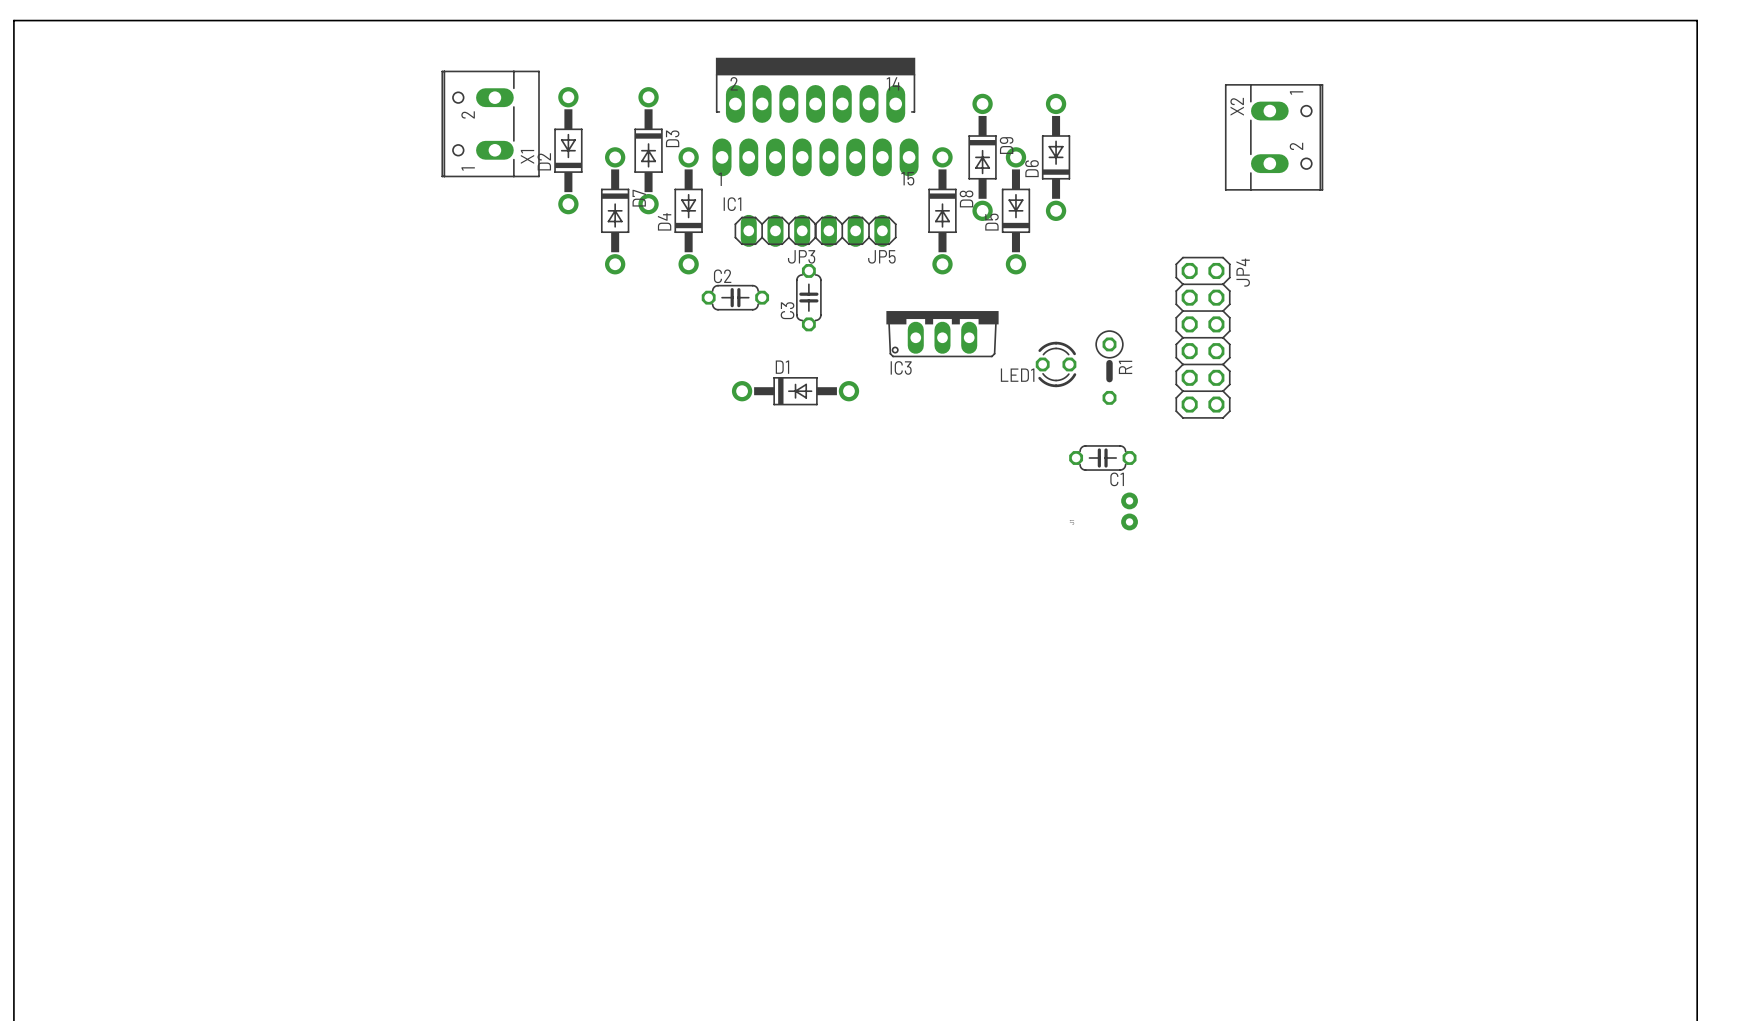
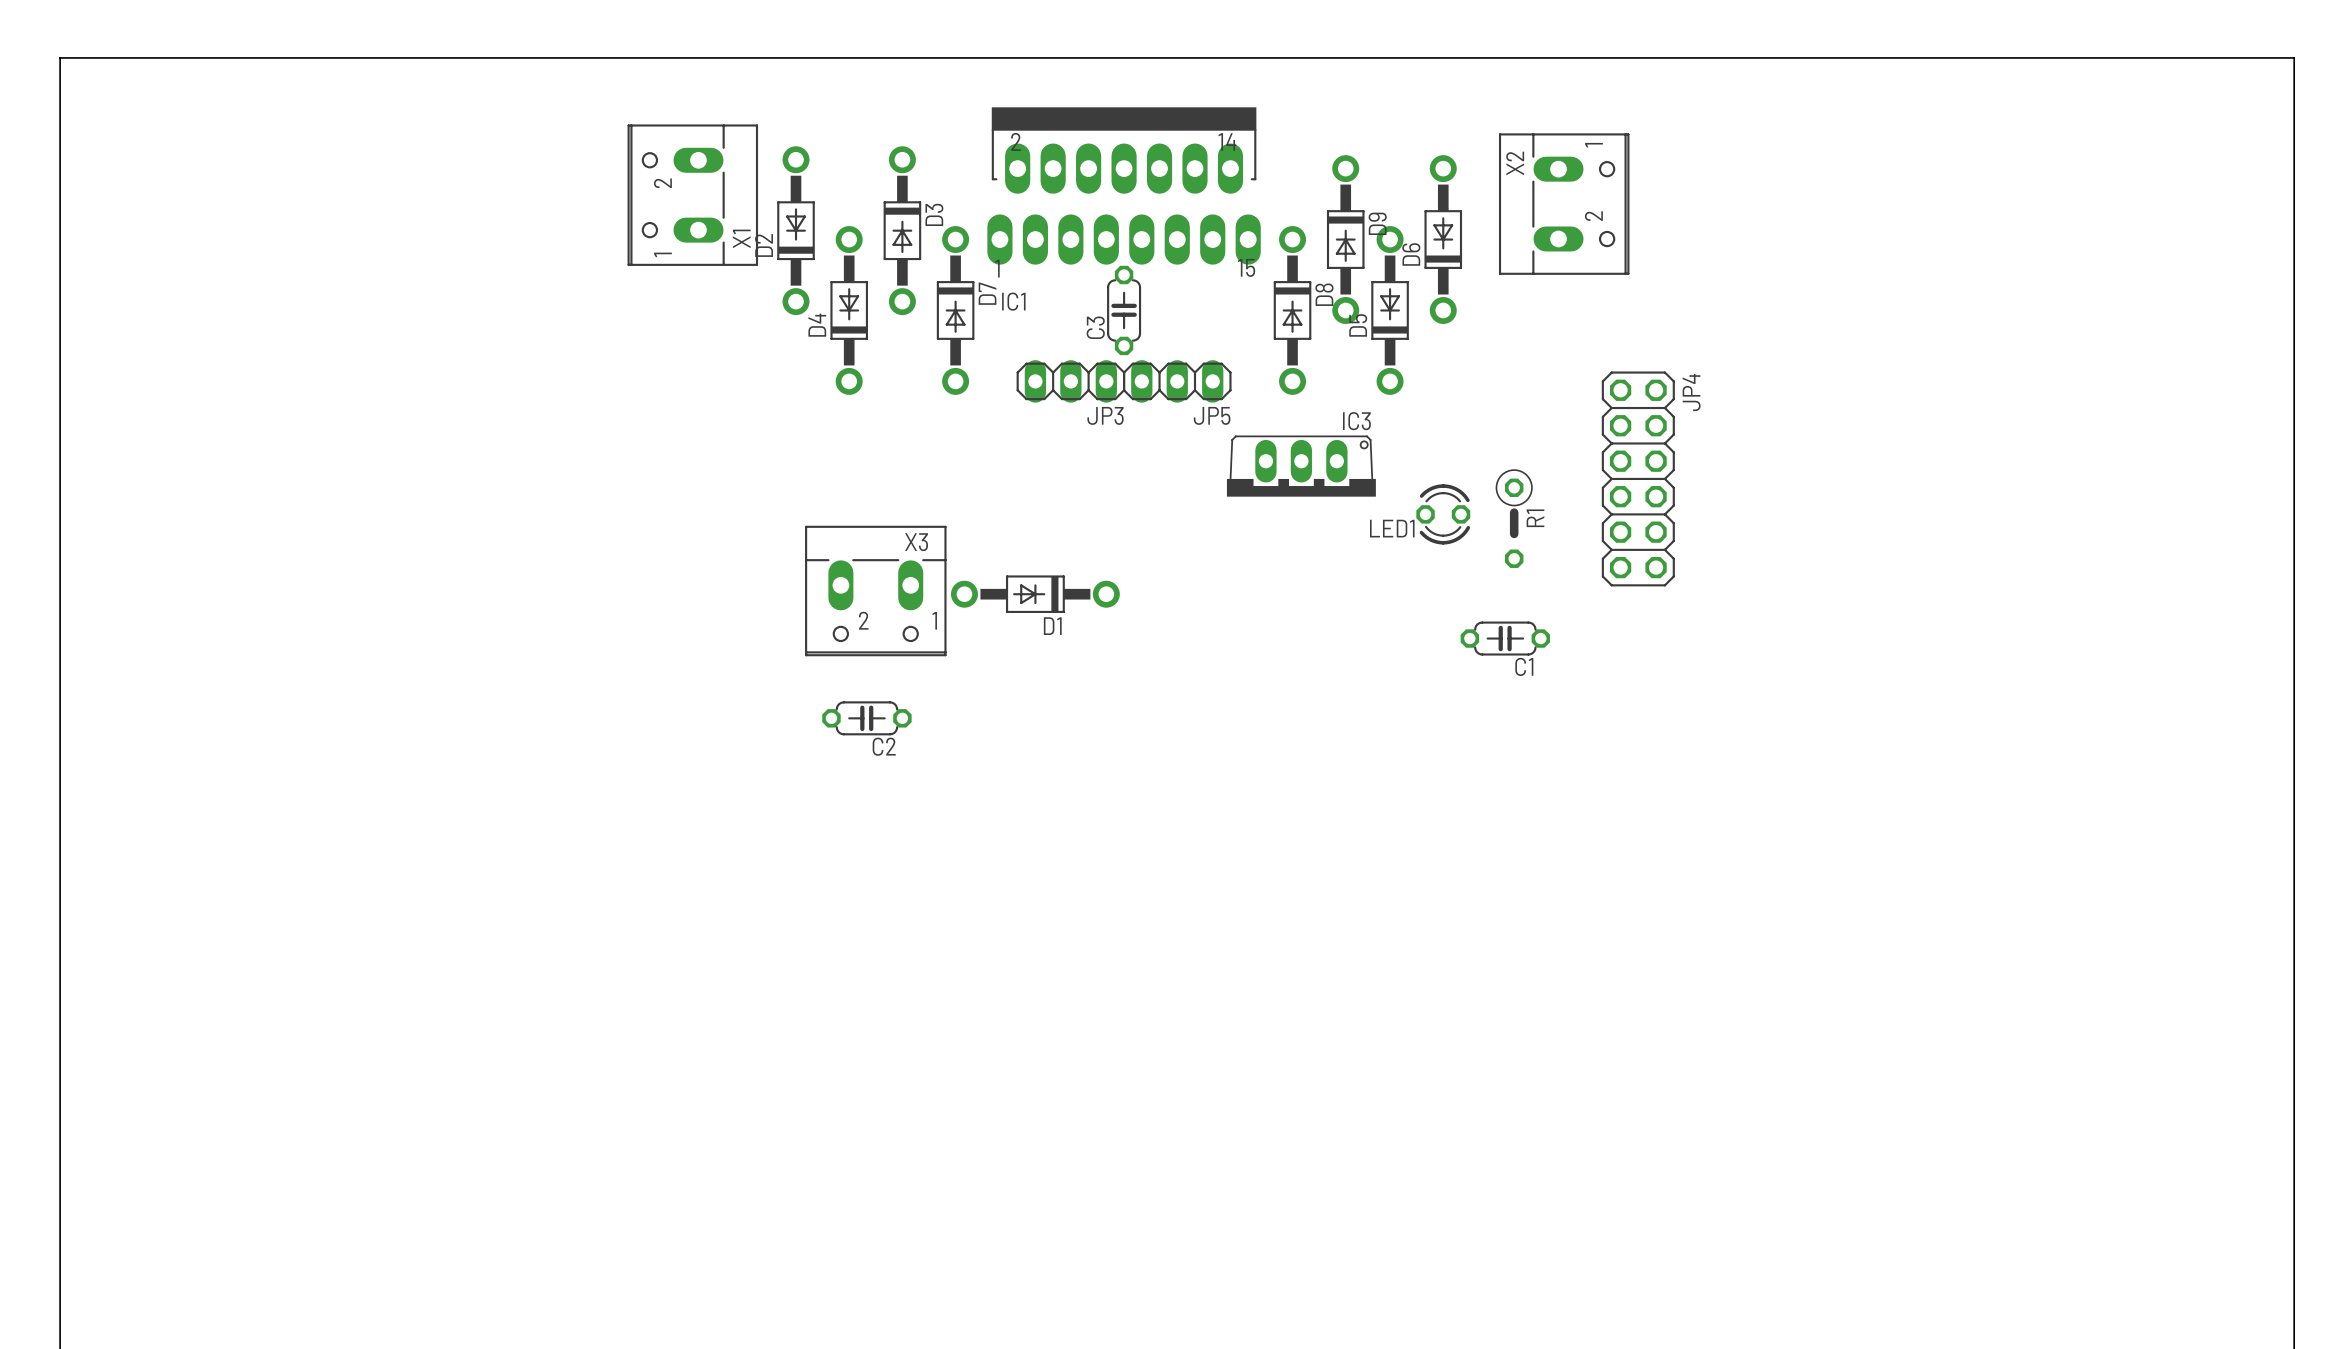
X2 position: (1274, 137) -> (1564, 204)
D7 position: (615, 210) -> (955, 310)
D4 position: (688, 210) -> (849, 310)
JP3 position: (775, 230) -> (1070, 381)
JP5 position: (855, 230) -> (1177, 381)
C2 rotation: 0° (735, 297) -> 180° (866, 718)
C2 position: (735, 297) -> (866, 718)
C3 position: (808, 297) -> (1124, 310)
IC3 rotation: 0° (942, 334) -> 180° (1301, 466)
D1 rotation: 0° (795, 391) -> 180° (1035, 594)
X3: none -> (875, 591)
part: (1129, 511) -> none

